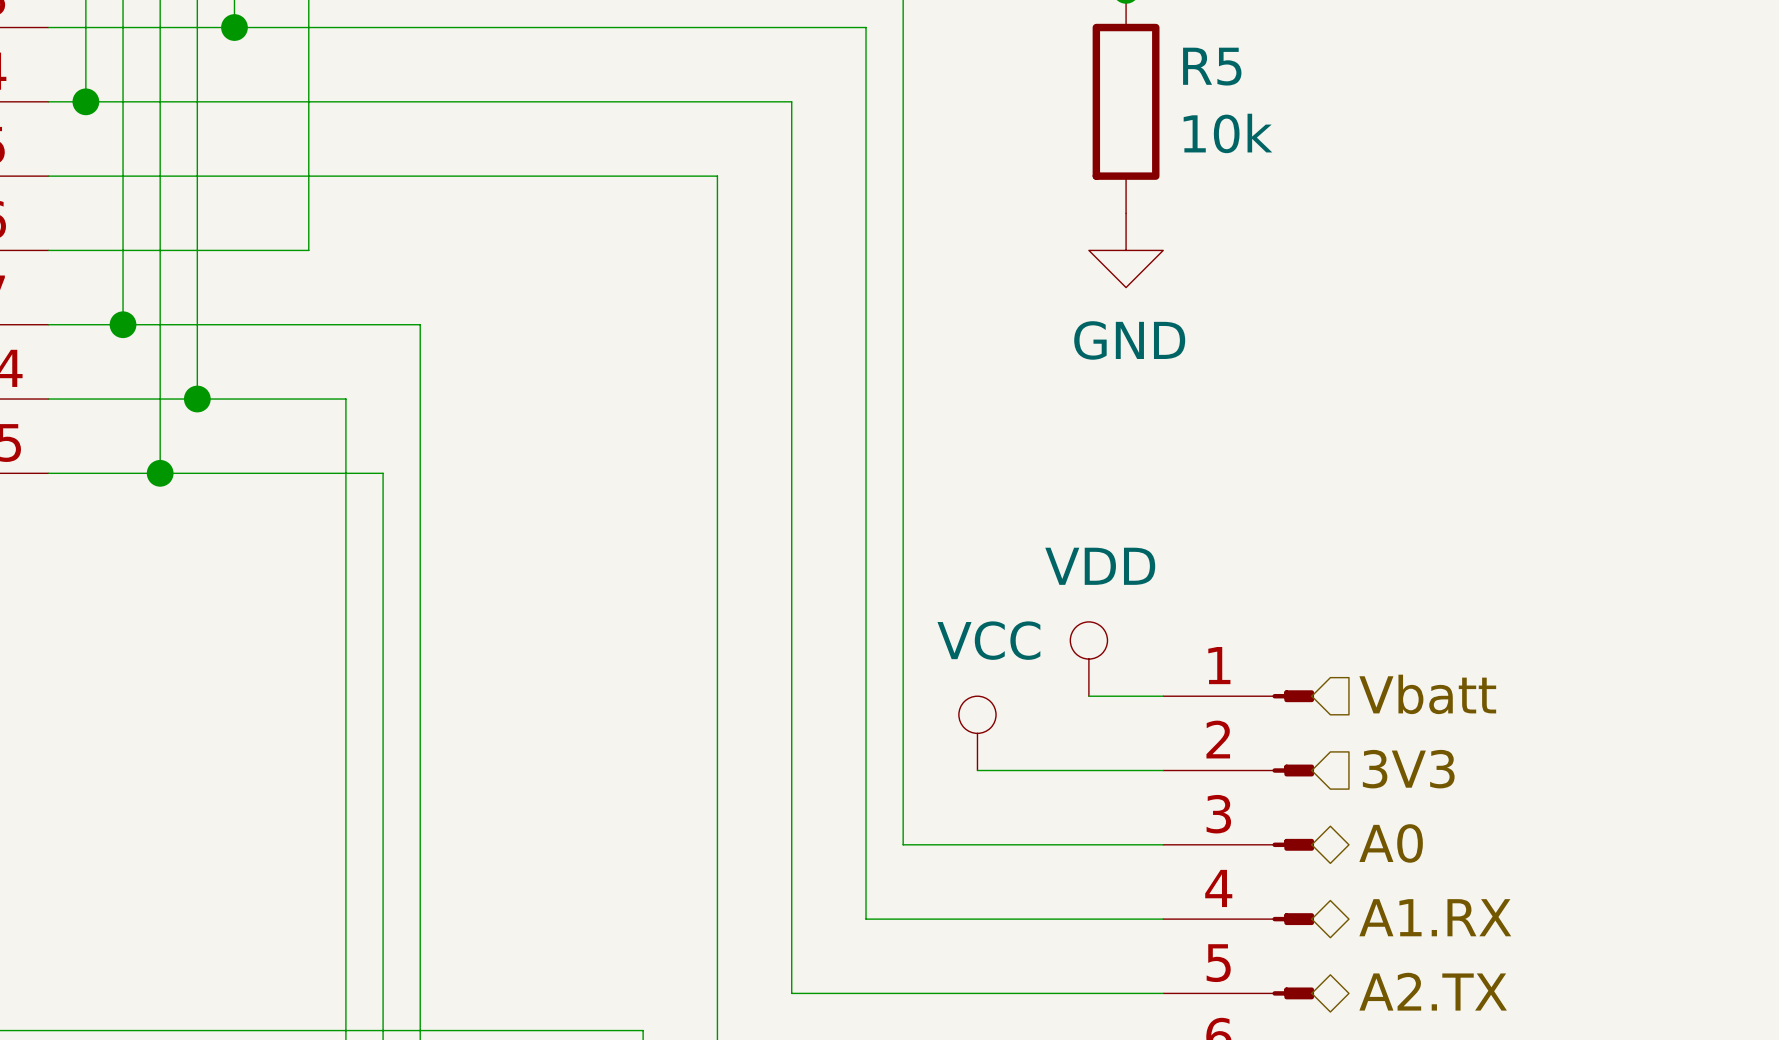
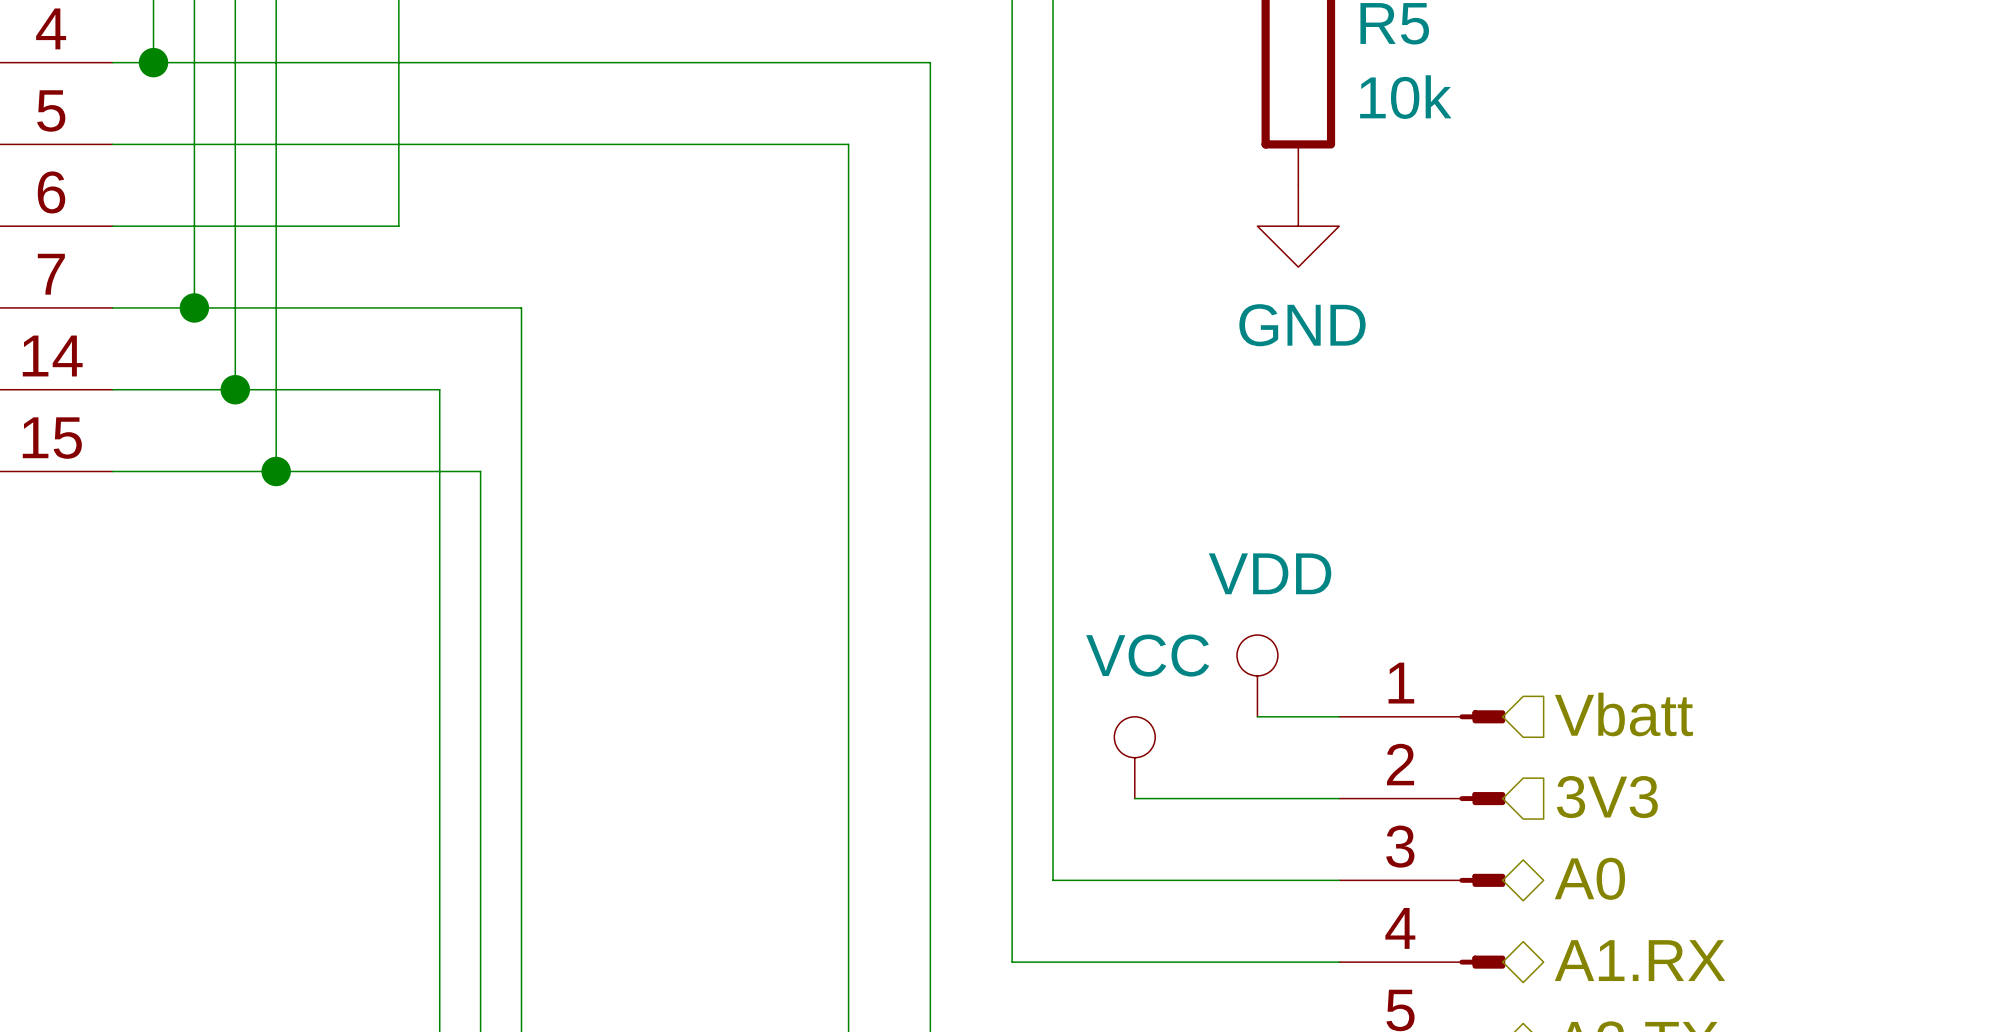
wire: (160, 399) (160, 473) -> (276, 389) (276, 471)
junction: none -> (235, 389)
junction: (197, 399) -> none
junction: (160, 473) -> none
junction: none -> (276, 471)

